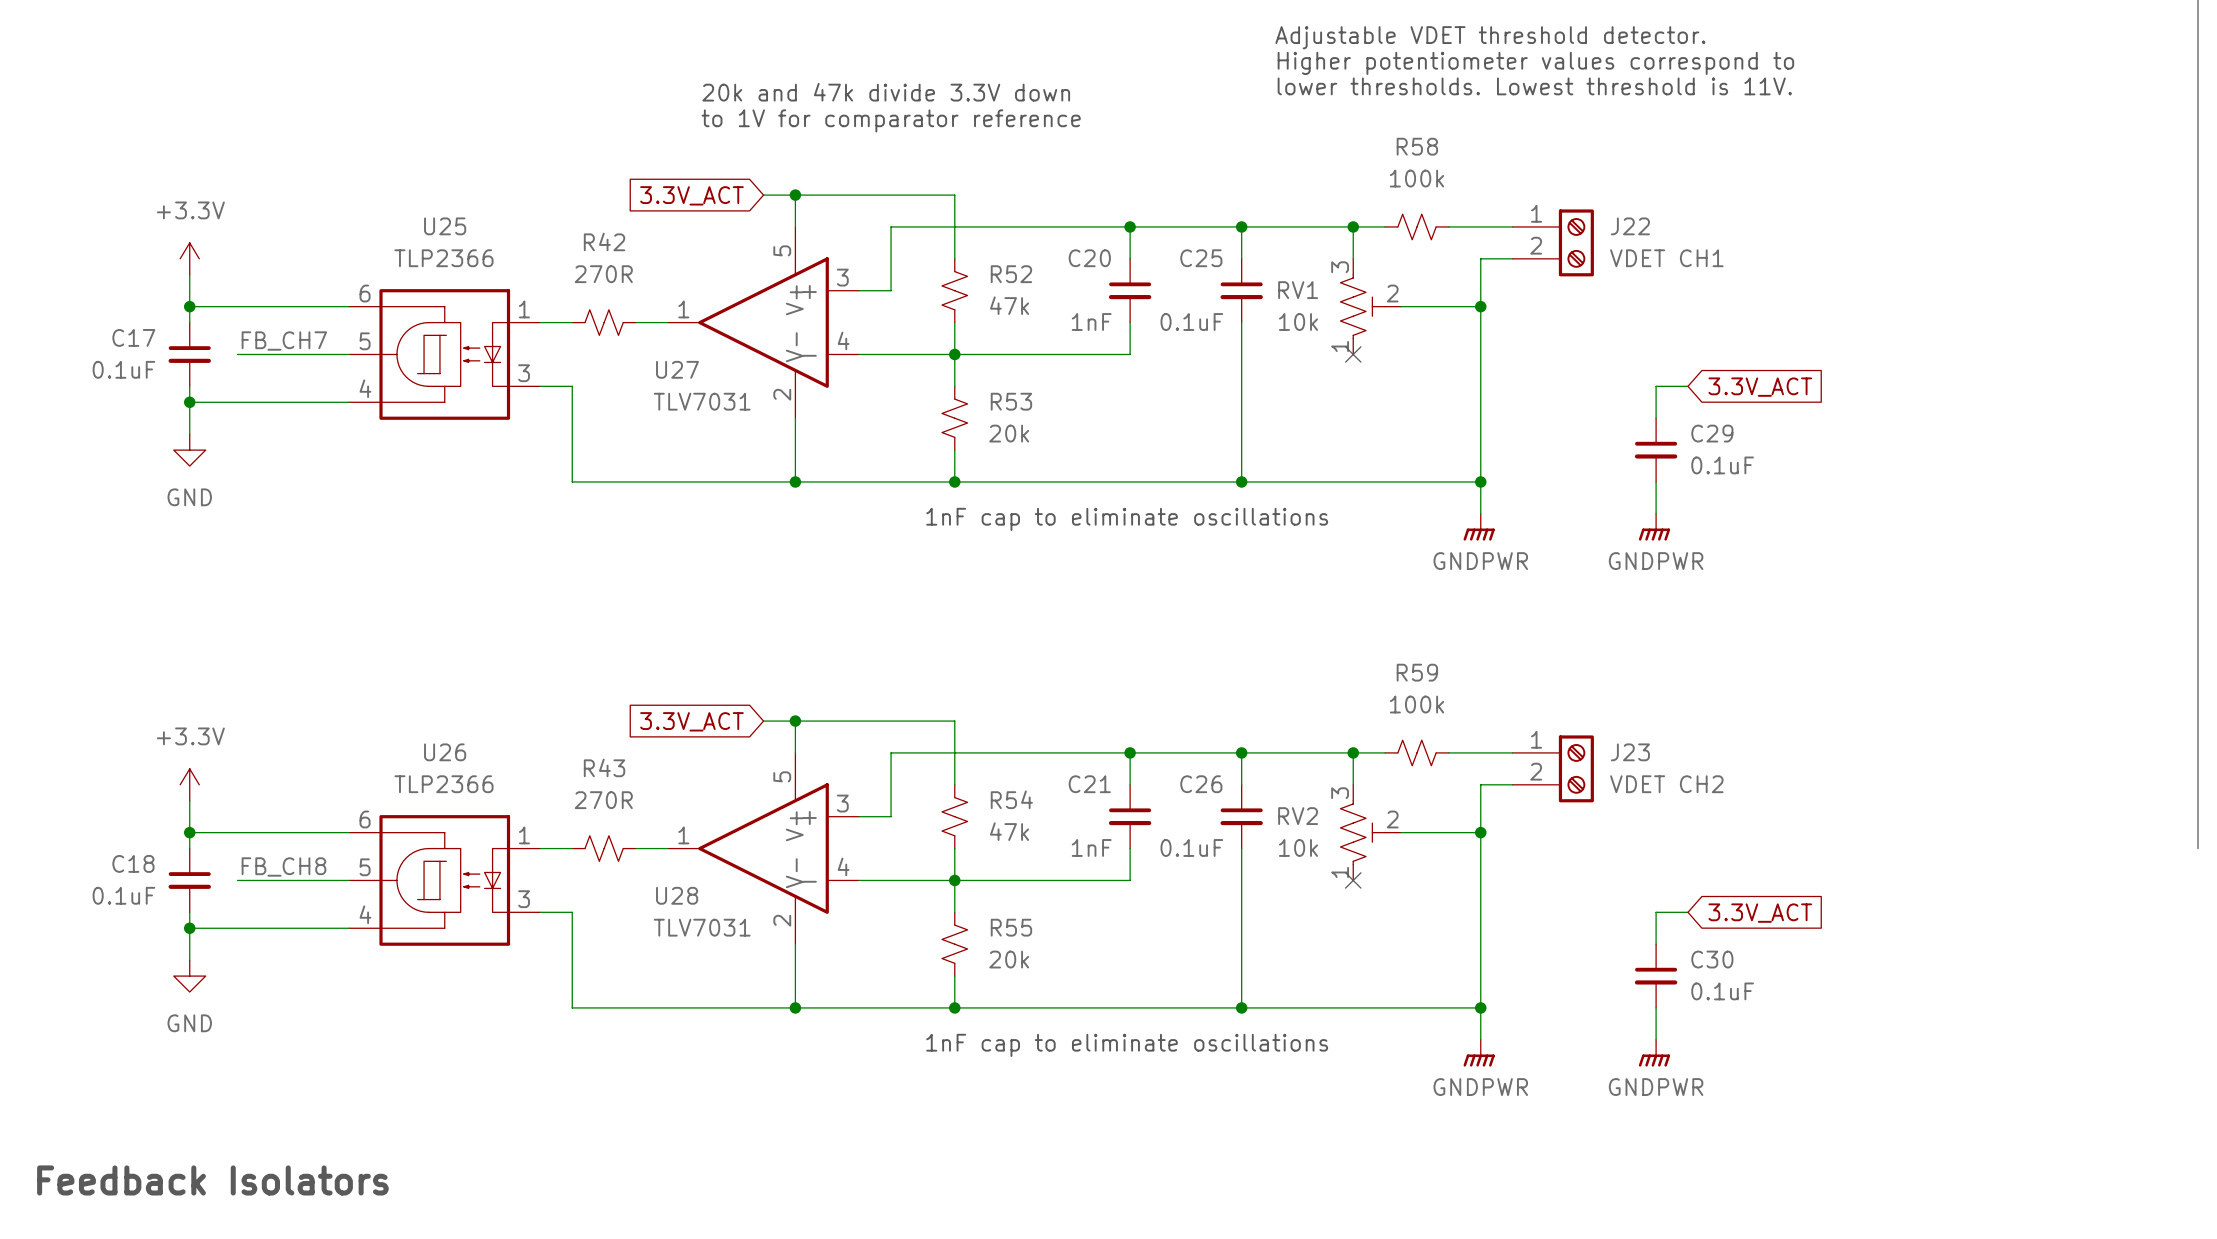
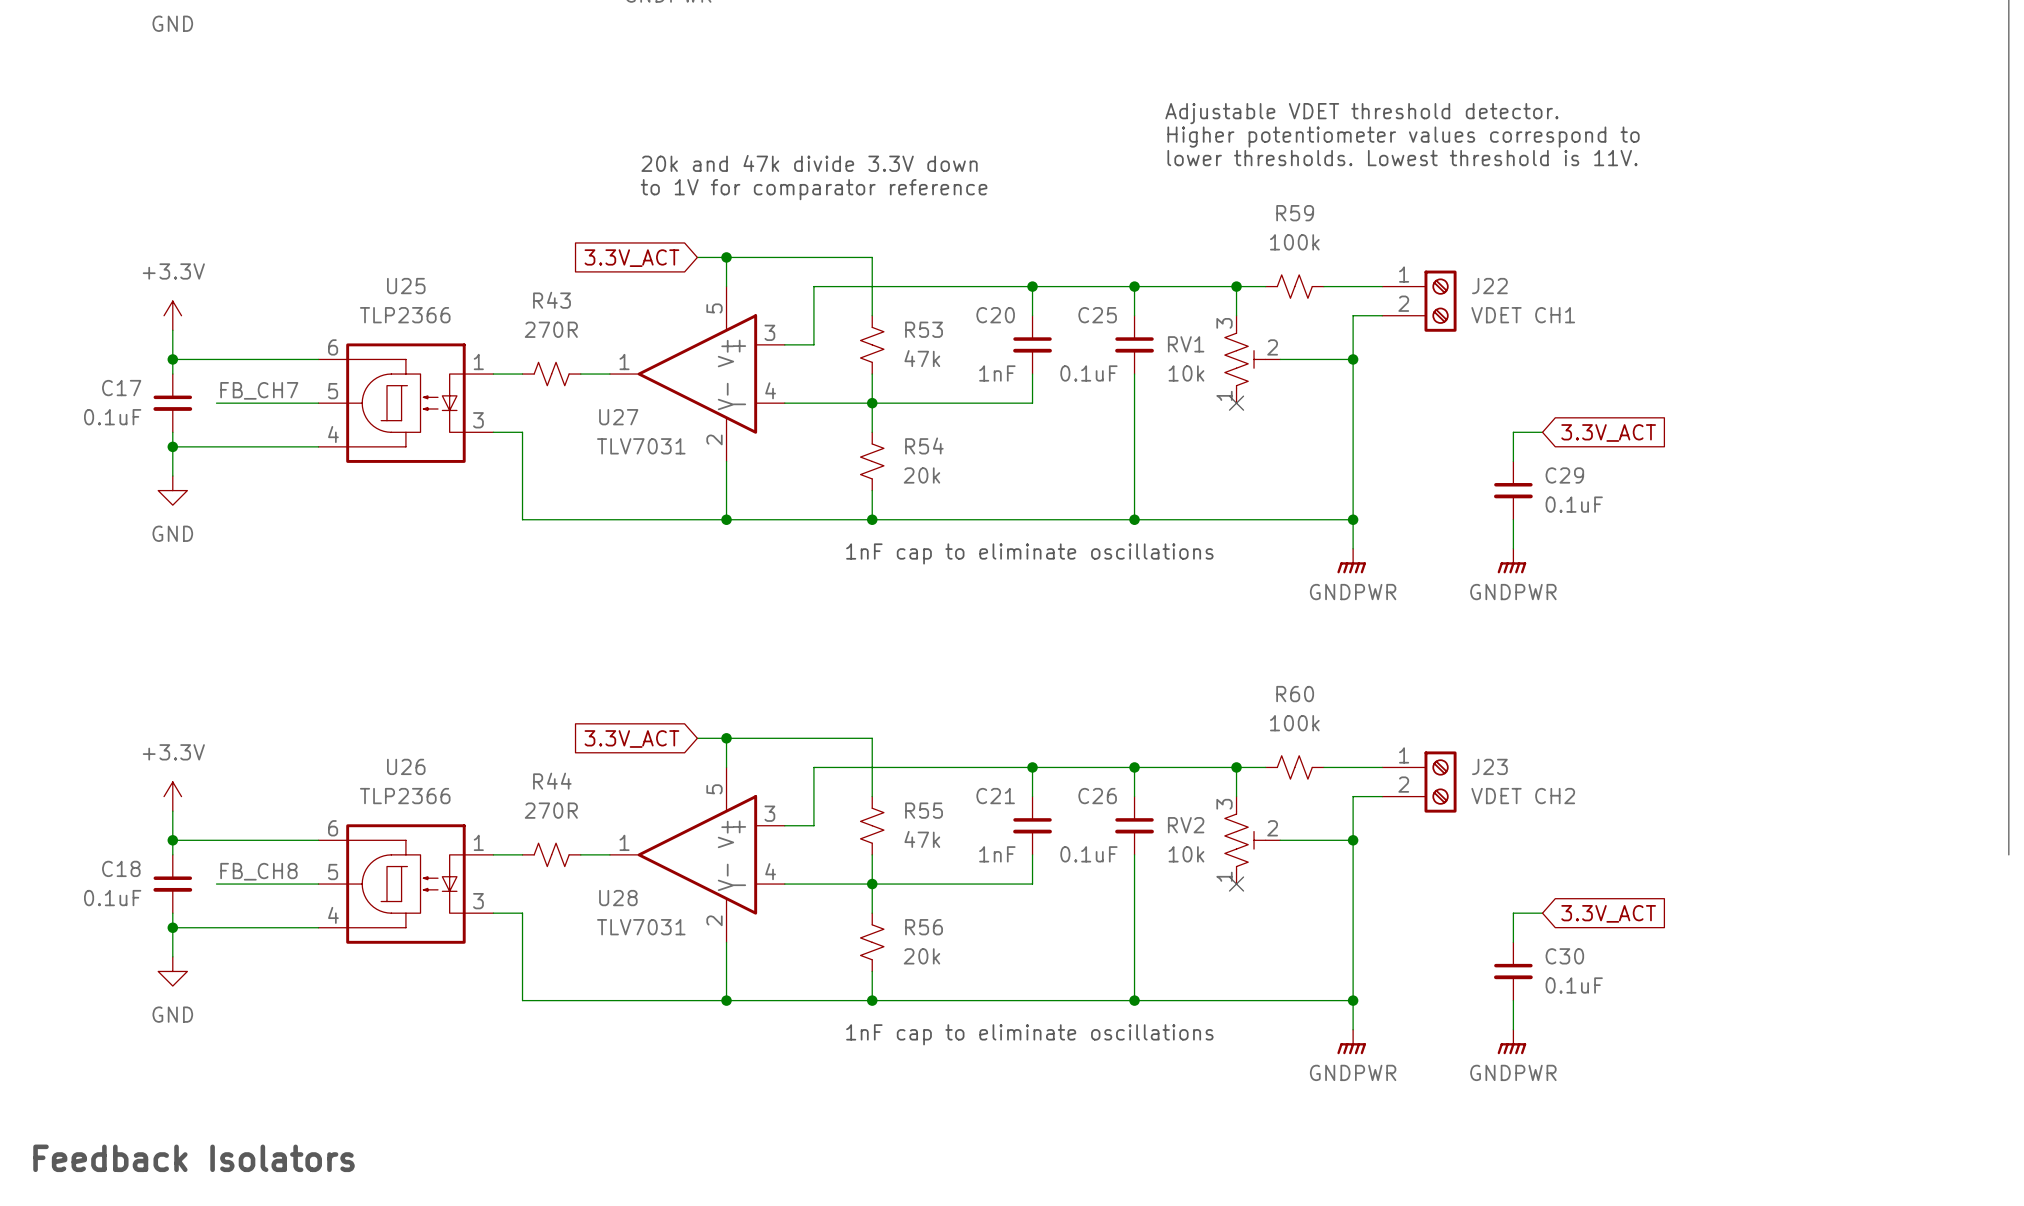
R58 name: R58 (1417, 146) -> R59 (1295, 213)
R42 name: R42 (604, 241) -> R43 (552, 300)
R52 name: R52 (1011, 274) -> R53 (924, 329)
R53 name: R53 (1011, 401) -> R54 (924, 445)
R59 name: R59 (1417, 672) -> R60 (1295, 694)
R43 name: R43 (604, 767) -> R44 (552, 781)
R54 name: R54 (1011, 799) -> R55 (924, 810)
R55 name: R55 (1011, 927) -> R56 (924, 927)

